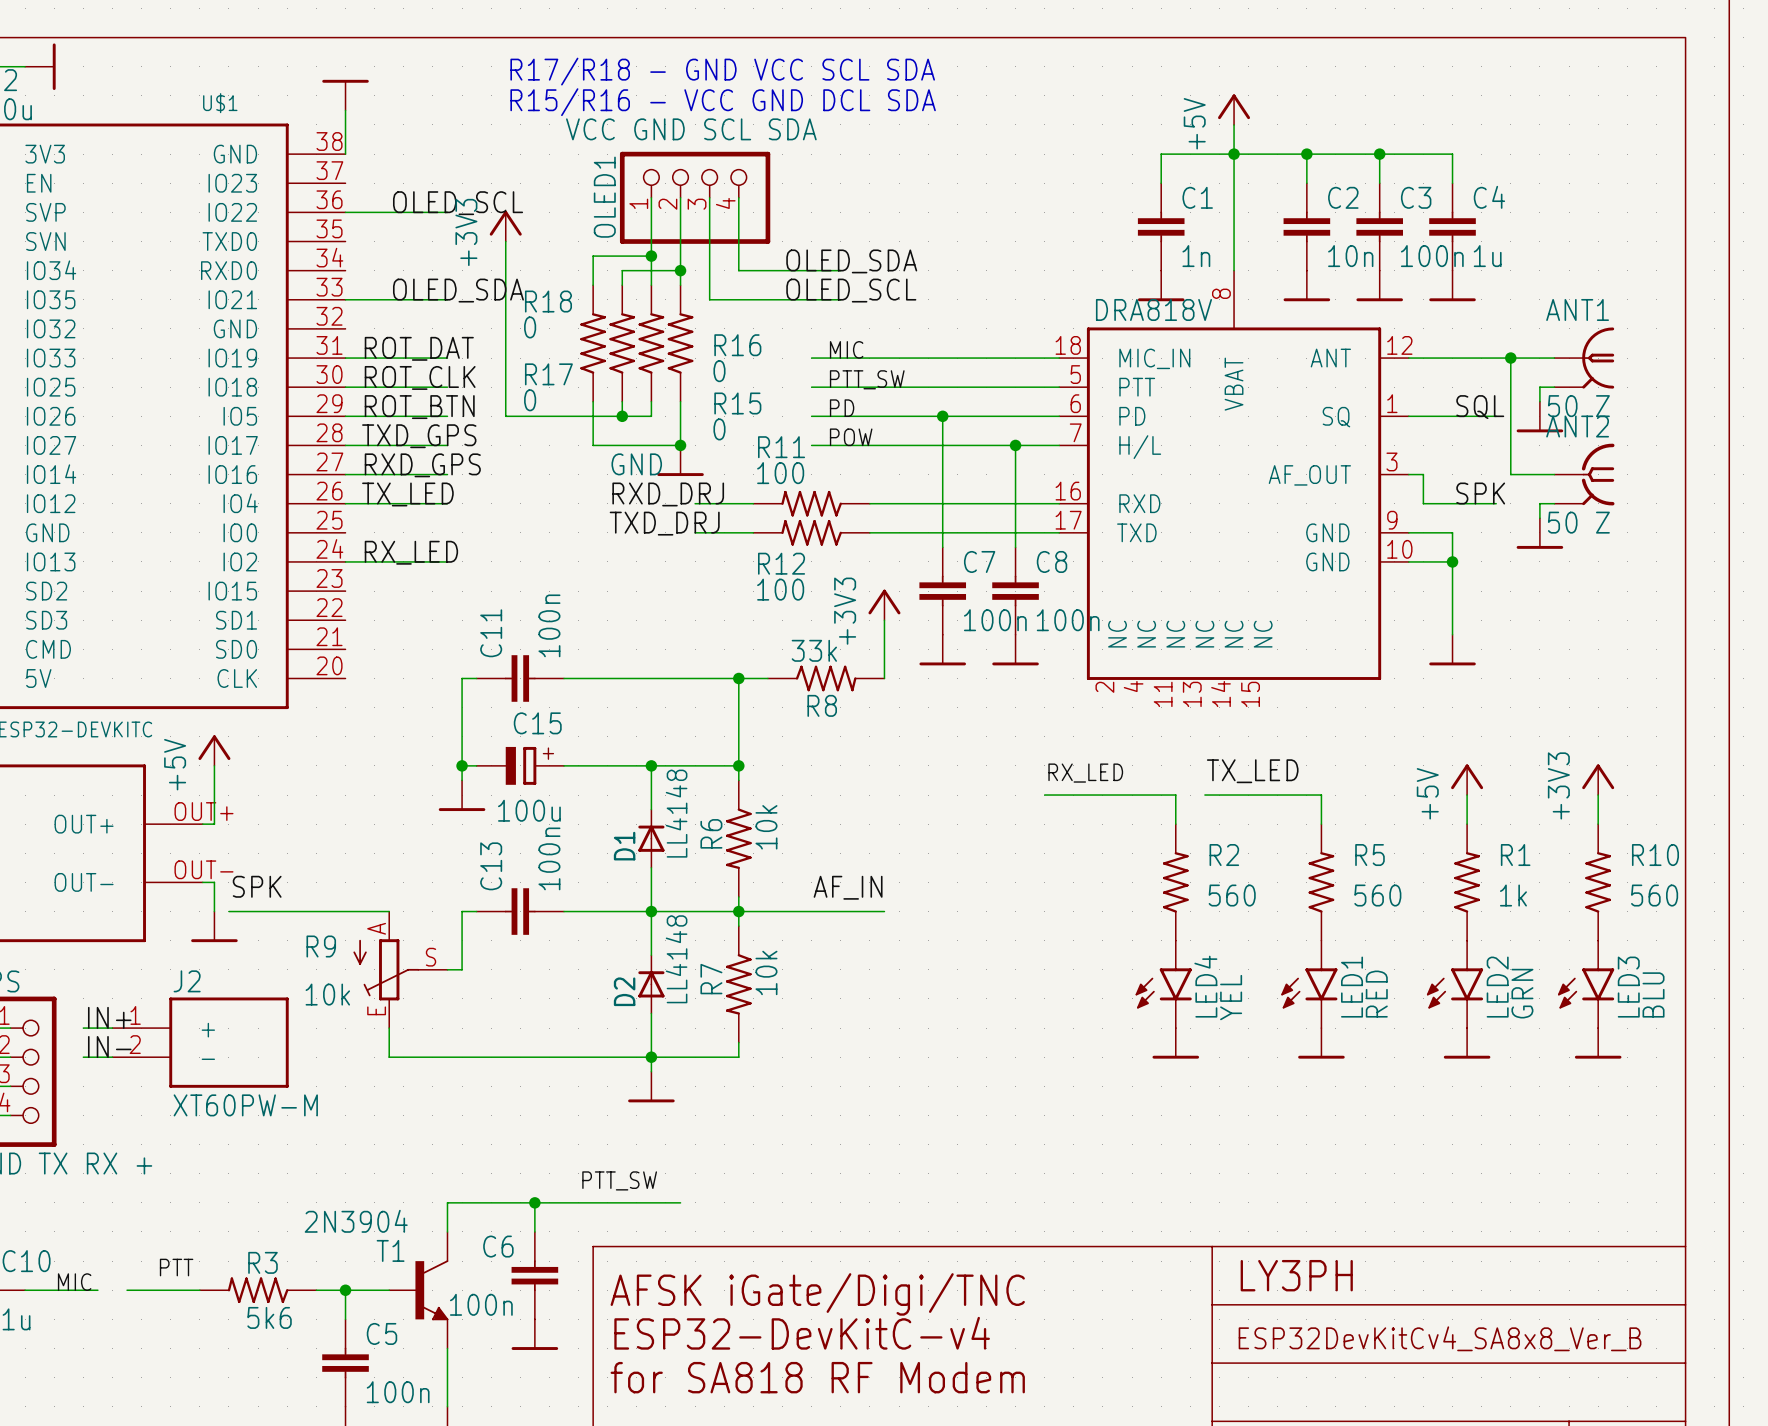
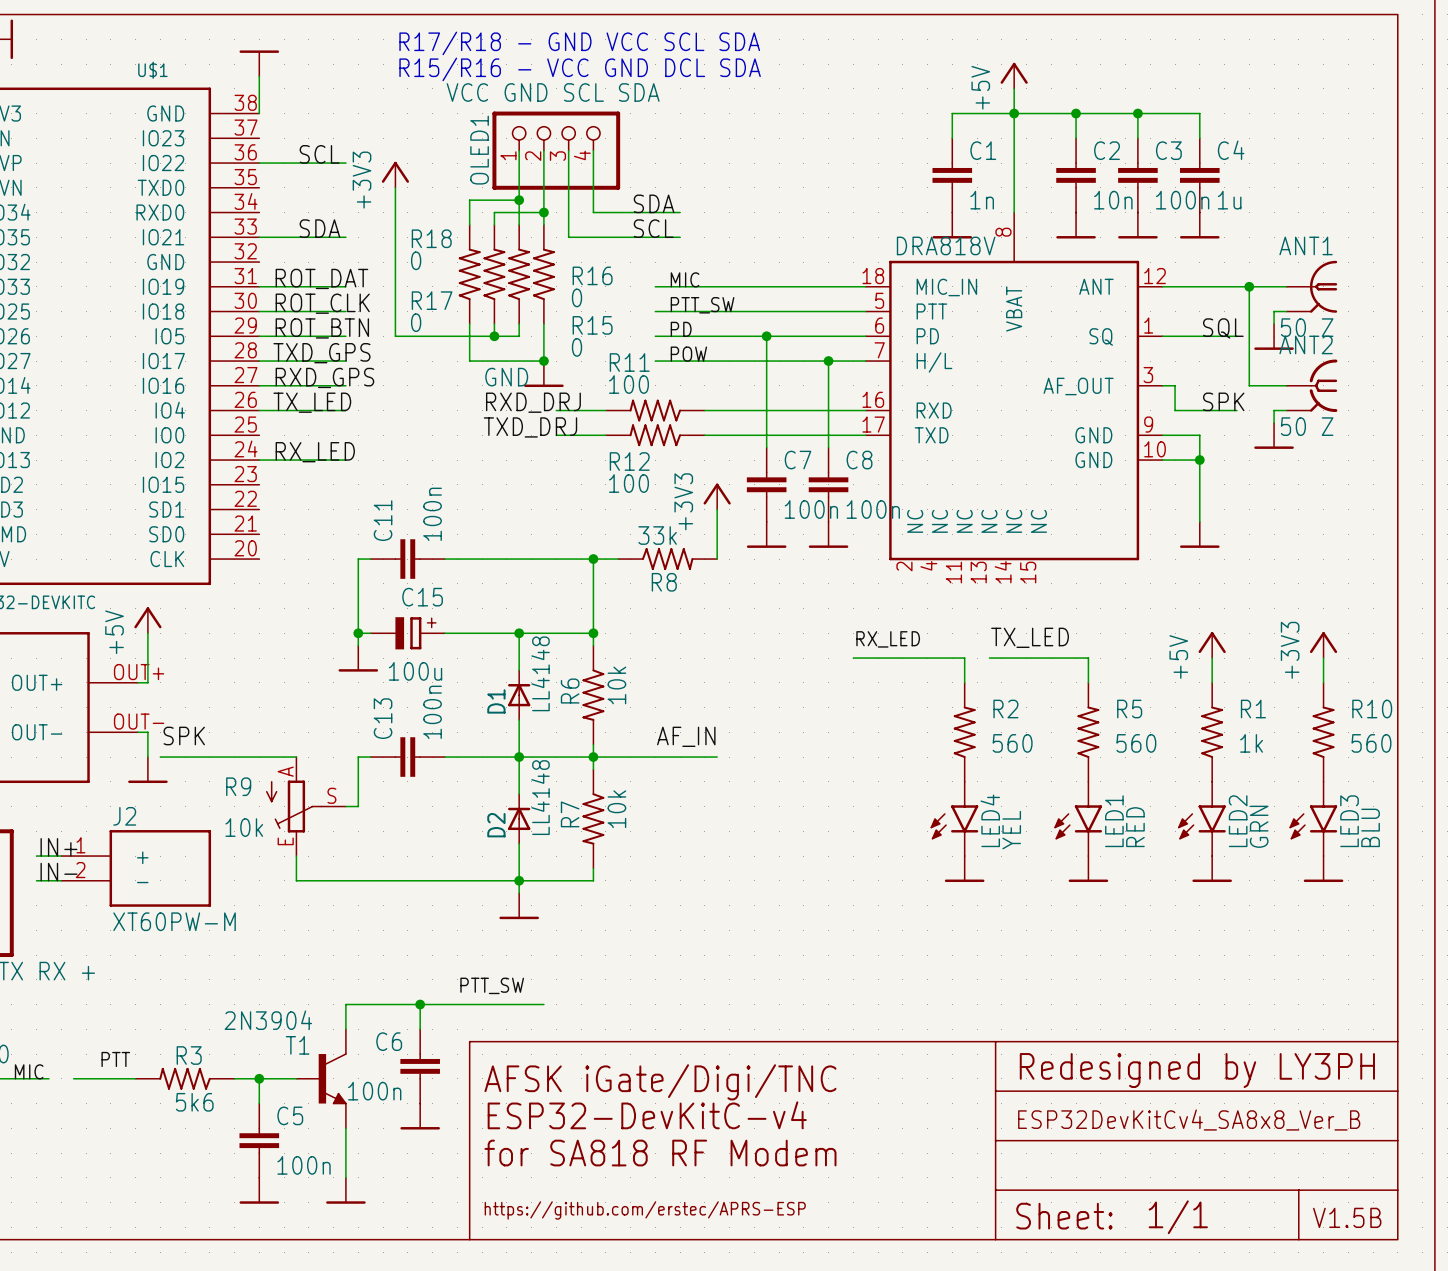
label: OLED_SCL (458, 203) -> SCL (319, 154)
label: OLED_SDA (851, 261) -> SDA (654, 203)
label: OLED_SDA (458, 290) -> SDA (319, 228)
label: OLED_SCL (851, 290) -> SCL (653, 228)
text: LY3PH (1296, 1275) -> Redesigned by LY3PH (1197, 1070)

